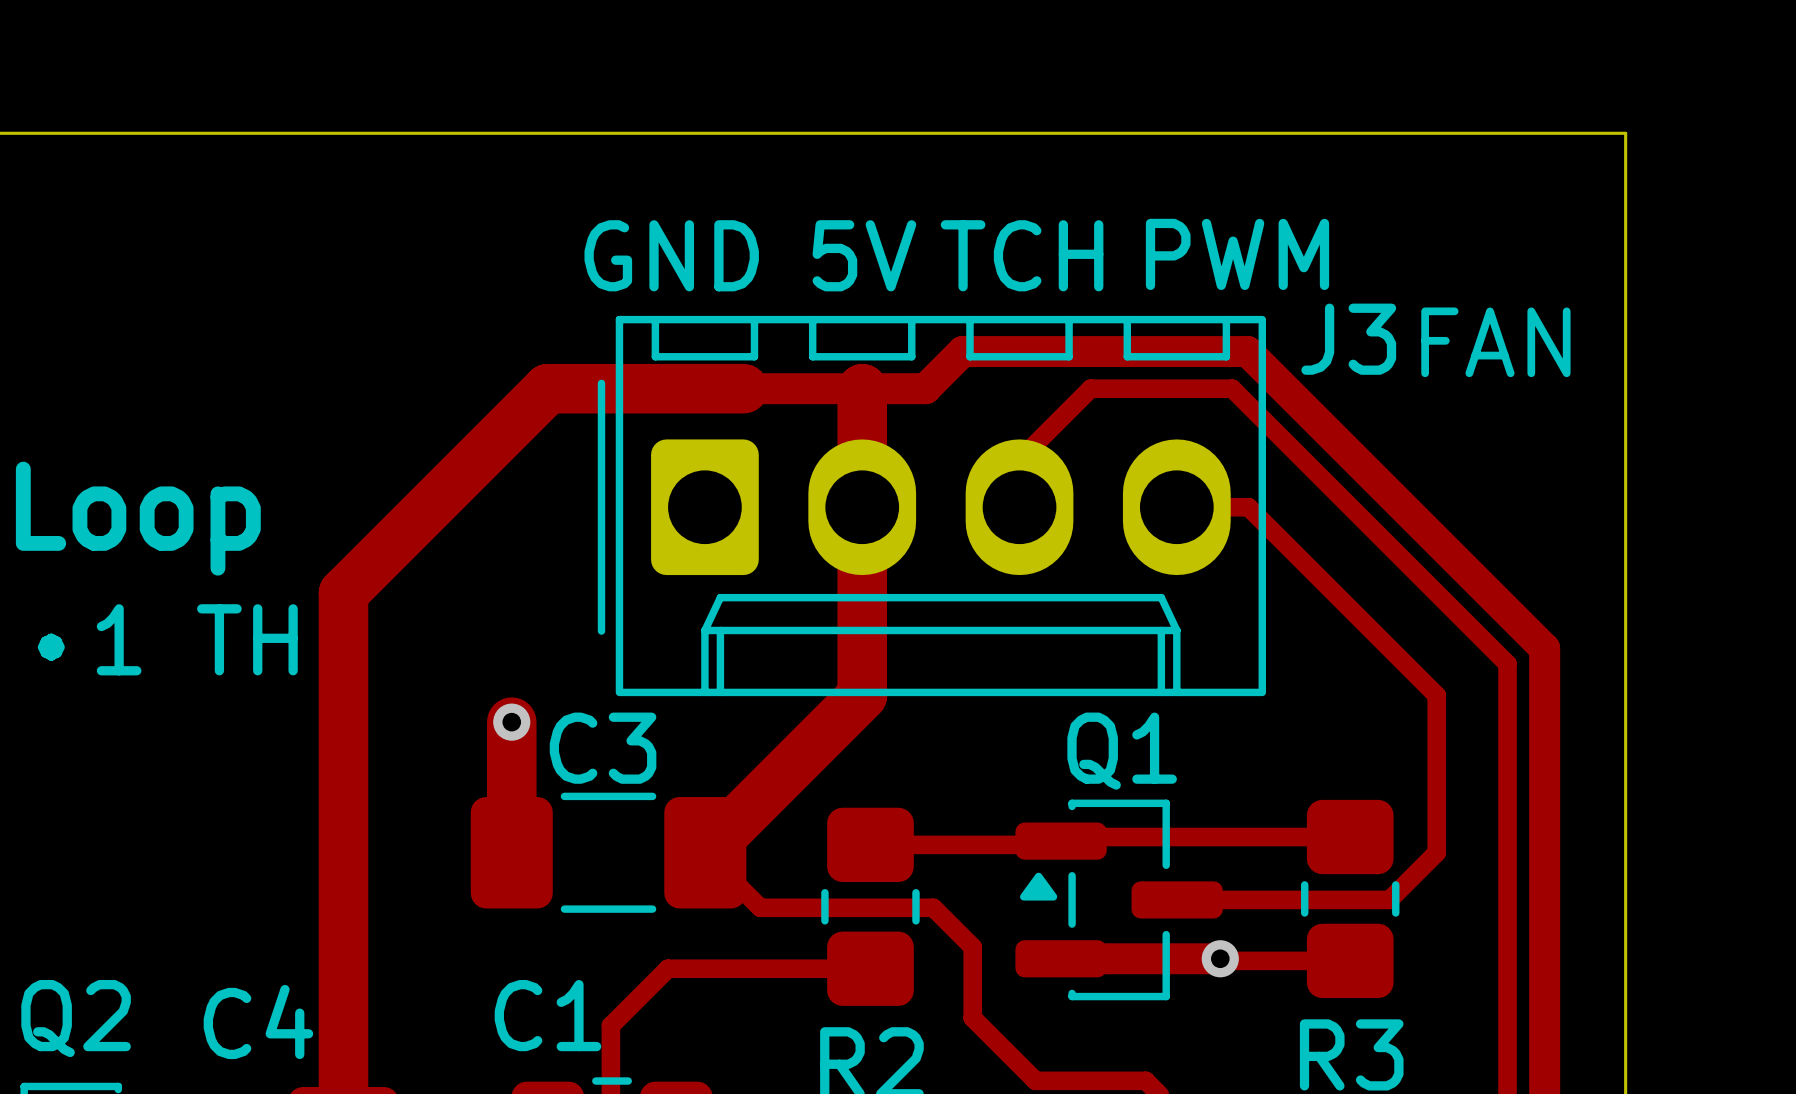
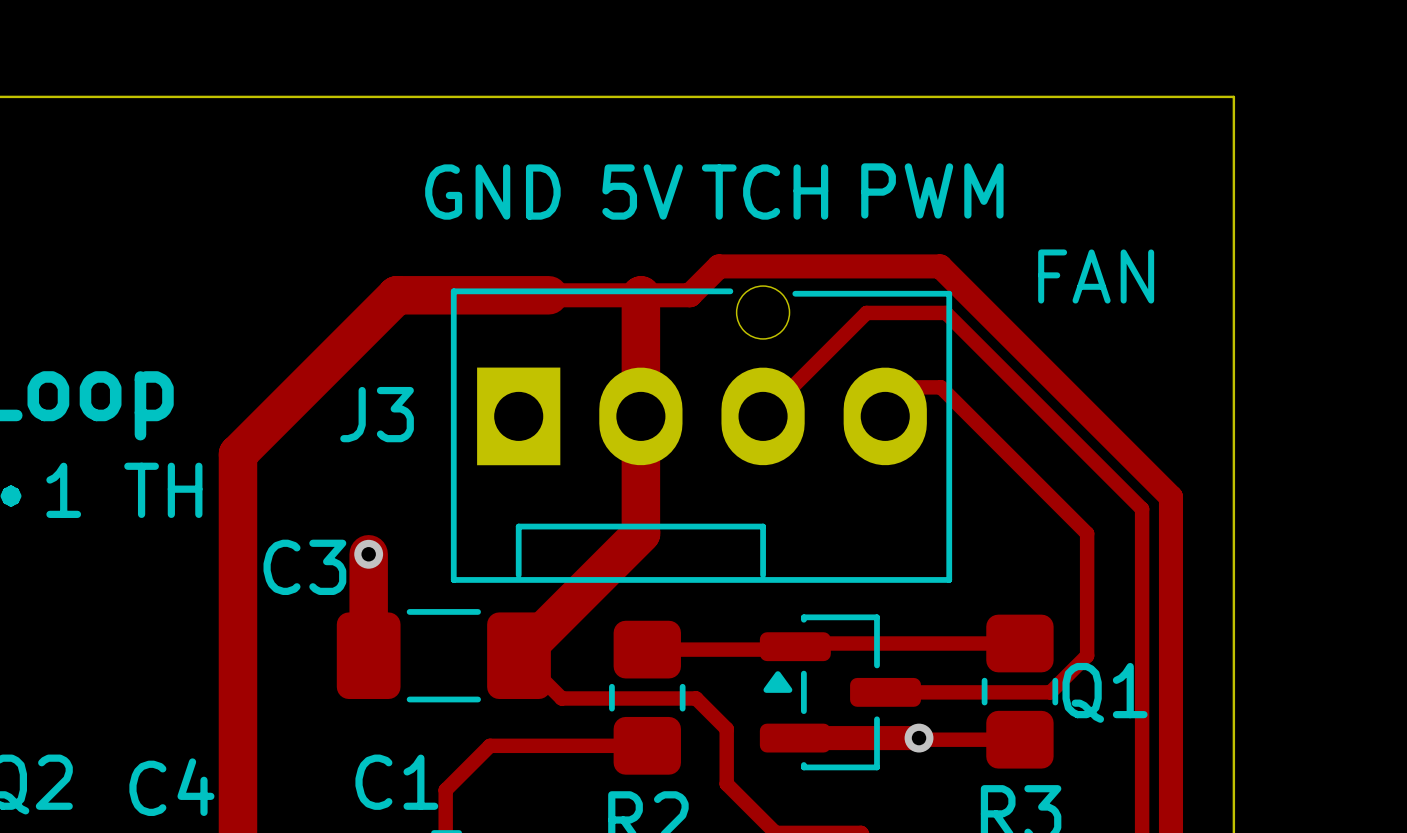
J3 footprint: [597, 315, 1267, 697] -> [450, 286, 953, 583]
J3 name position: J3 (1348, 339) -> J3 (377, 414)
text position: FAN (1495, 342) -> FAN (1096, 276)
track: (1254, 411) (1232, 388) (1090, 388) (1019, 459) (1019, 507) -> (945, 312) (866, 312) (763, 416)
C3 name position: C3 (603, 748) -> C3 (304, 567)
Q1 name position: Q1 (1122, 751) -> Q1 (1105, 692)

